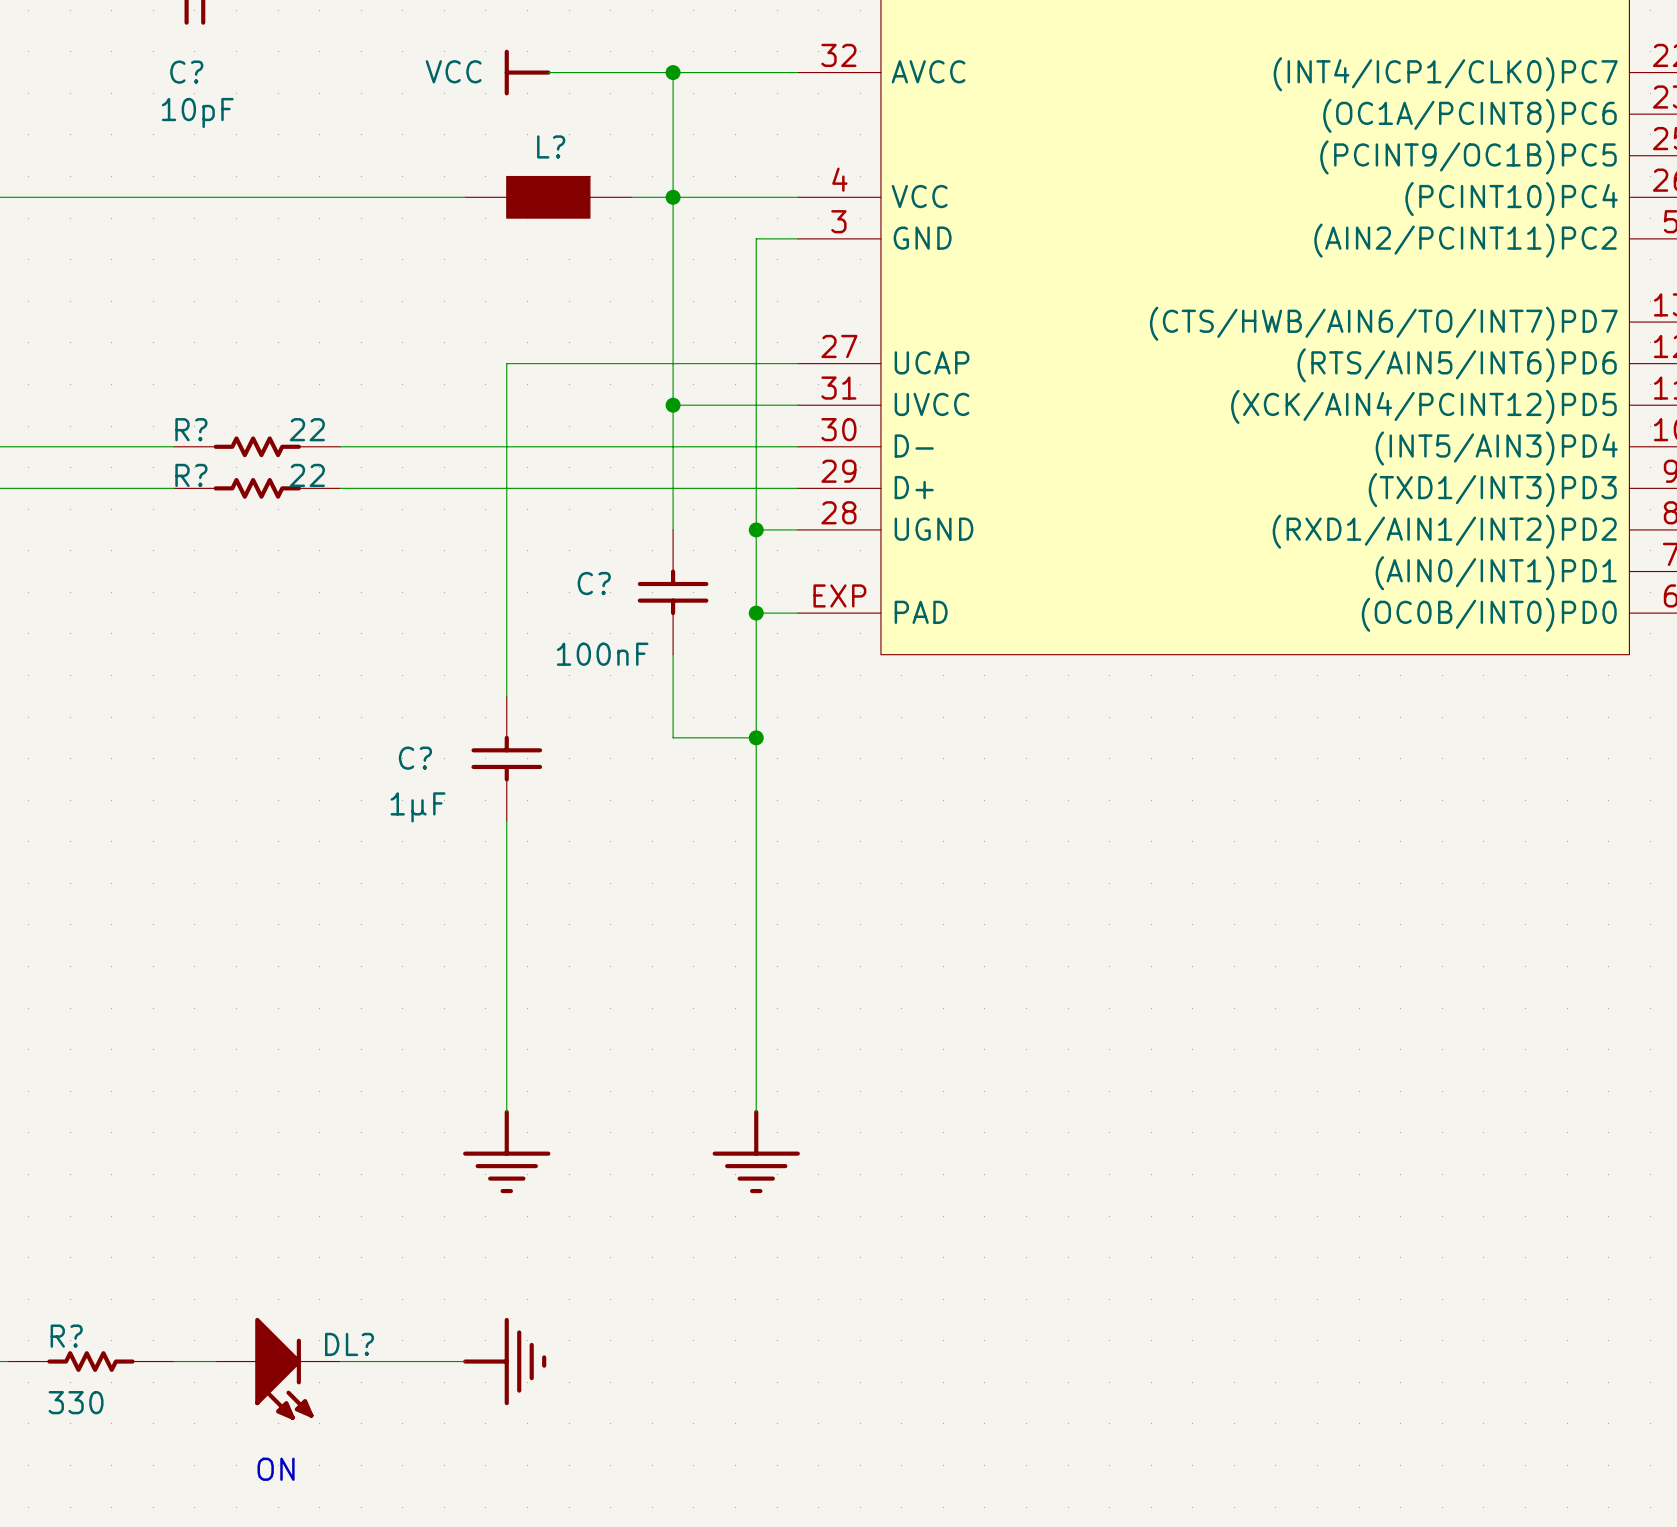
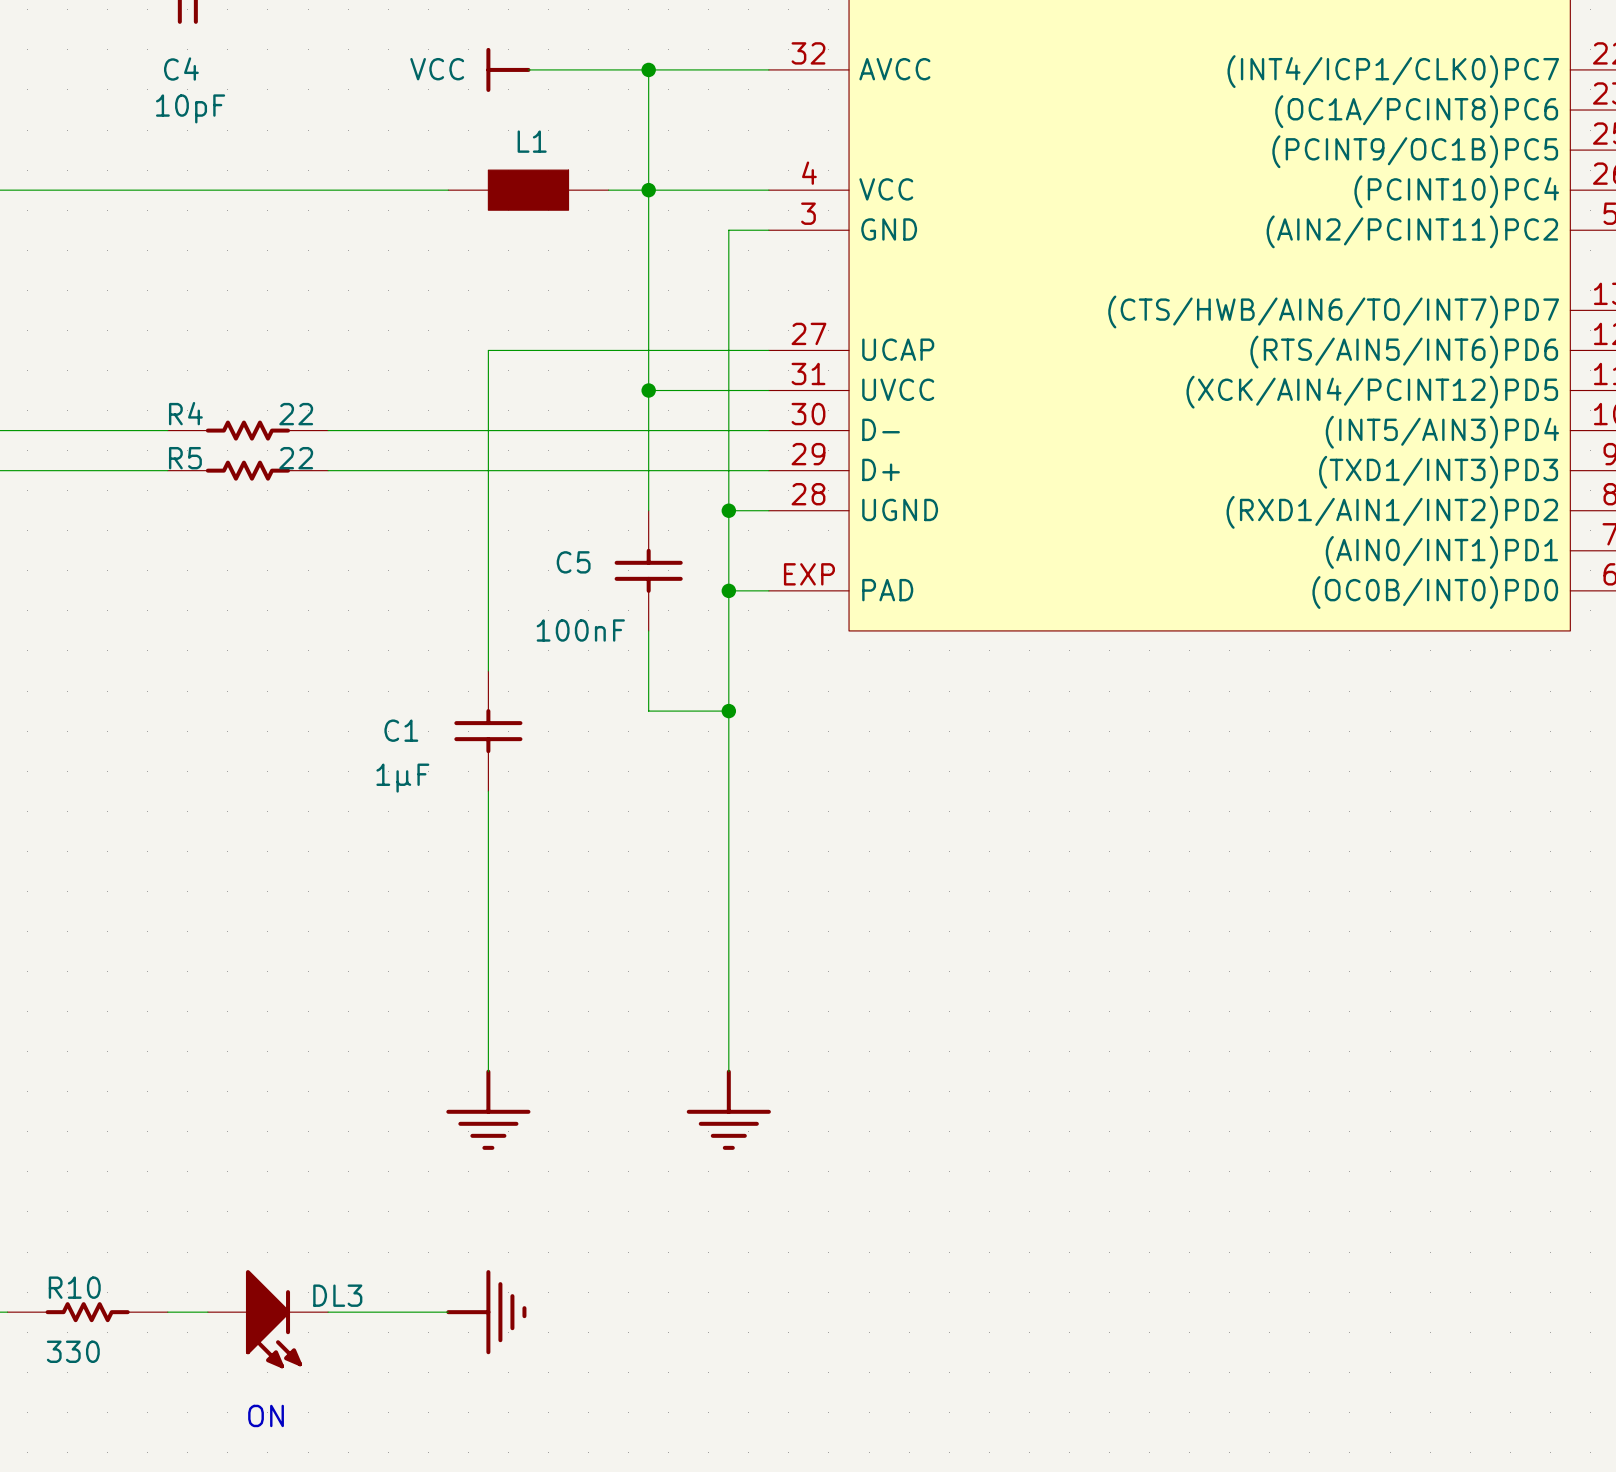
C? name: C? (186, 72) -> C4 (181, 69)
L? name: L? (551, 146) -> L1 (532, 141)
R? name: R? (191, 429) -> R4 (185, 413)
R? name: R? (191, 475) -> R5 (185, 458)
C? name: C? (594, 583) -> C5 (573, 562)
C? name: C? (415, 758) -> C1 (401, 730)
R? name: R? (66, 1336) -> R10 (74, 1287)
DL? name: DL? (349, 1344) -> DL3 (337, 1295)

